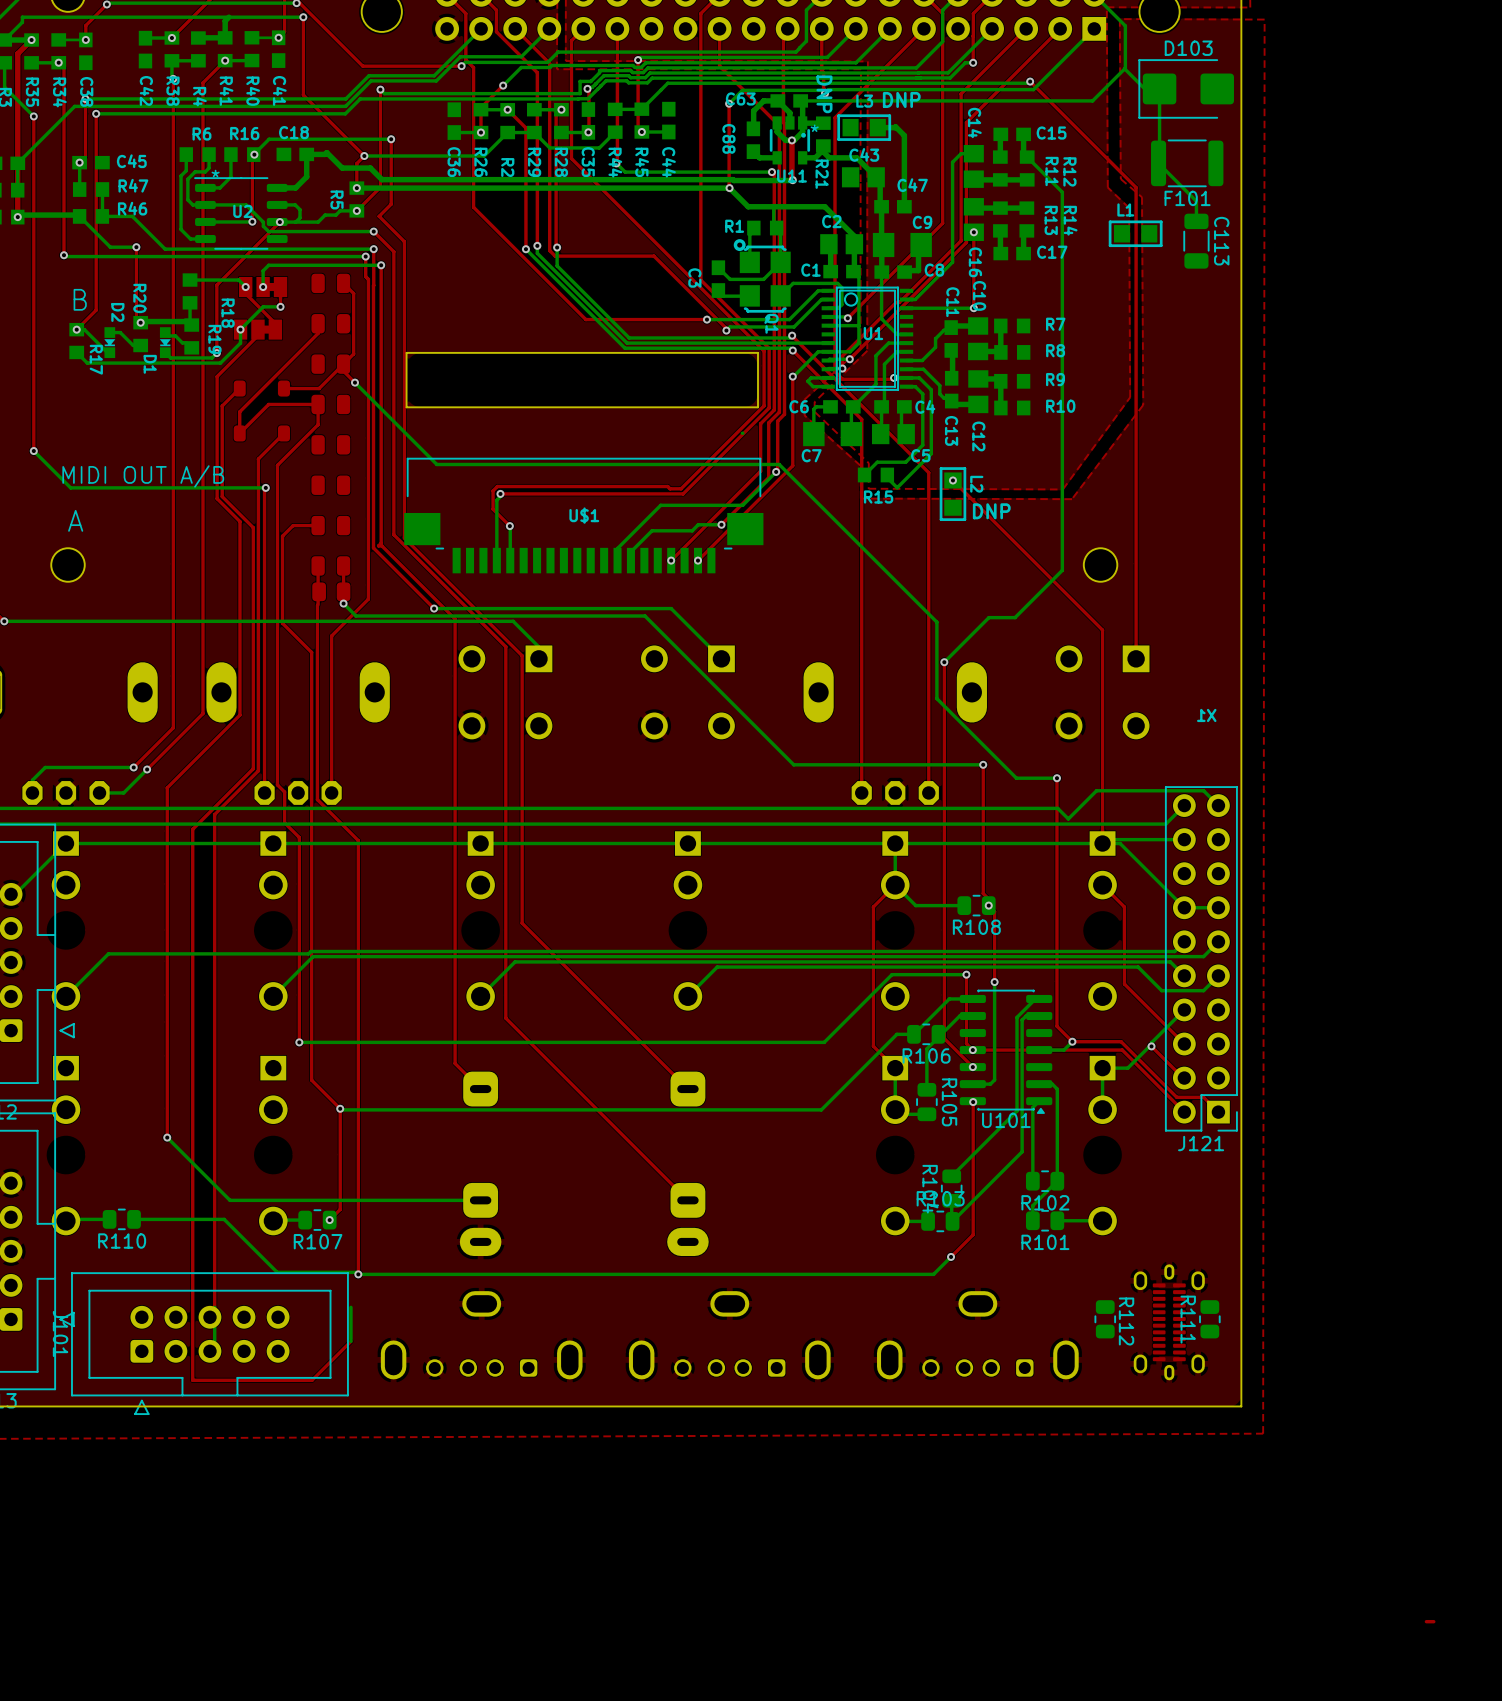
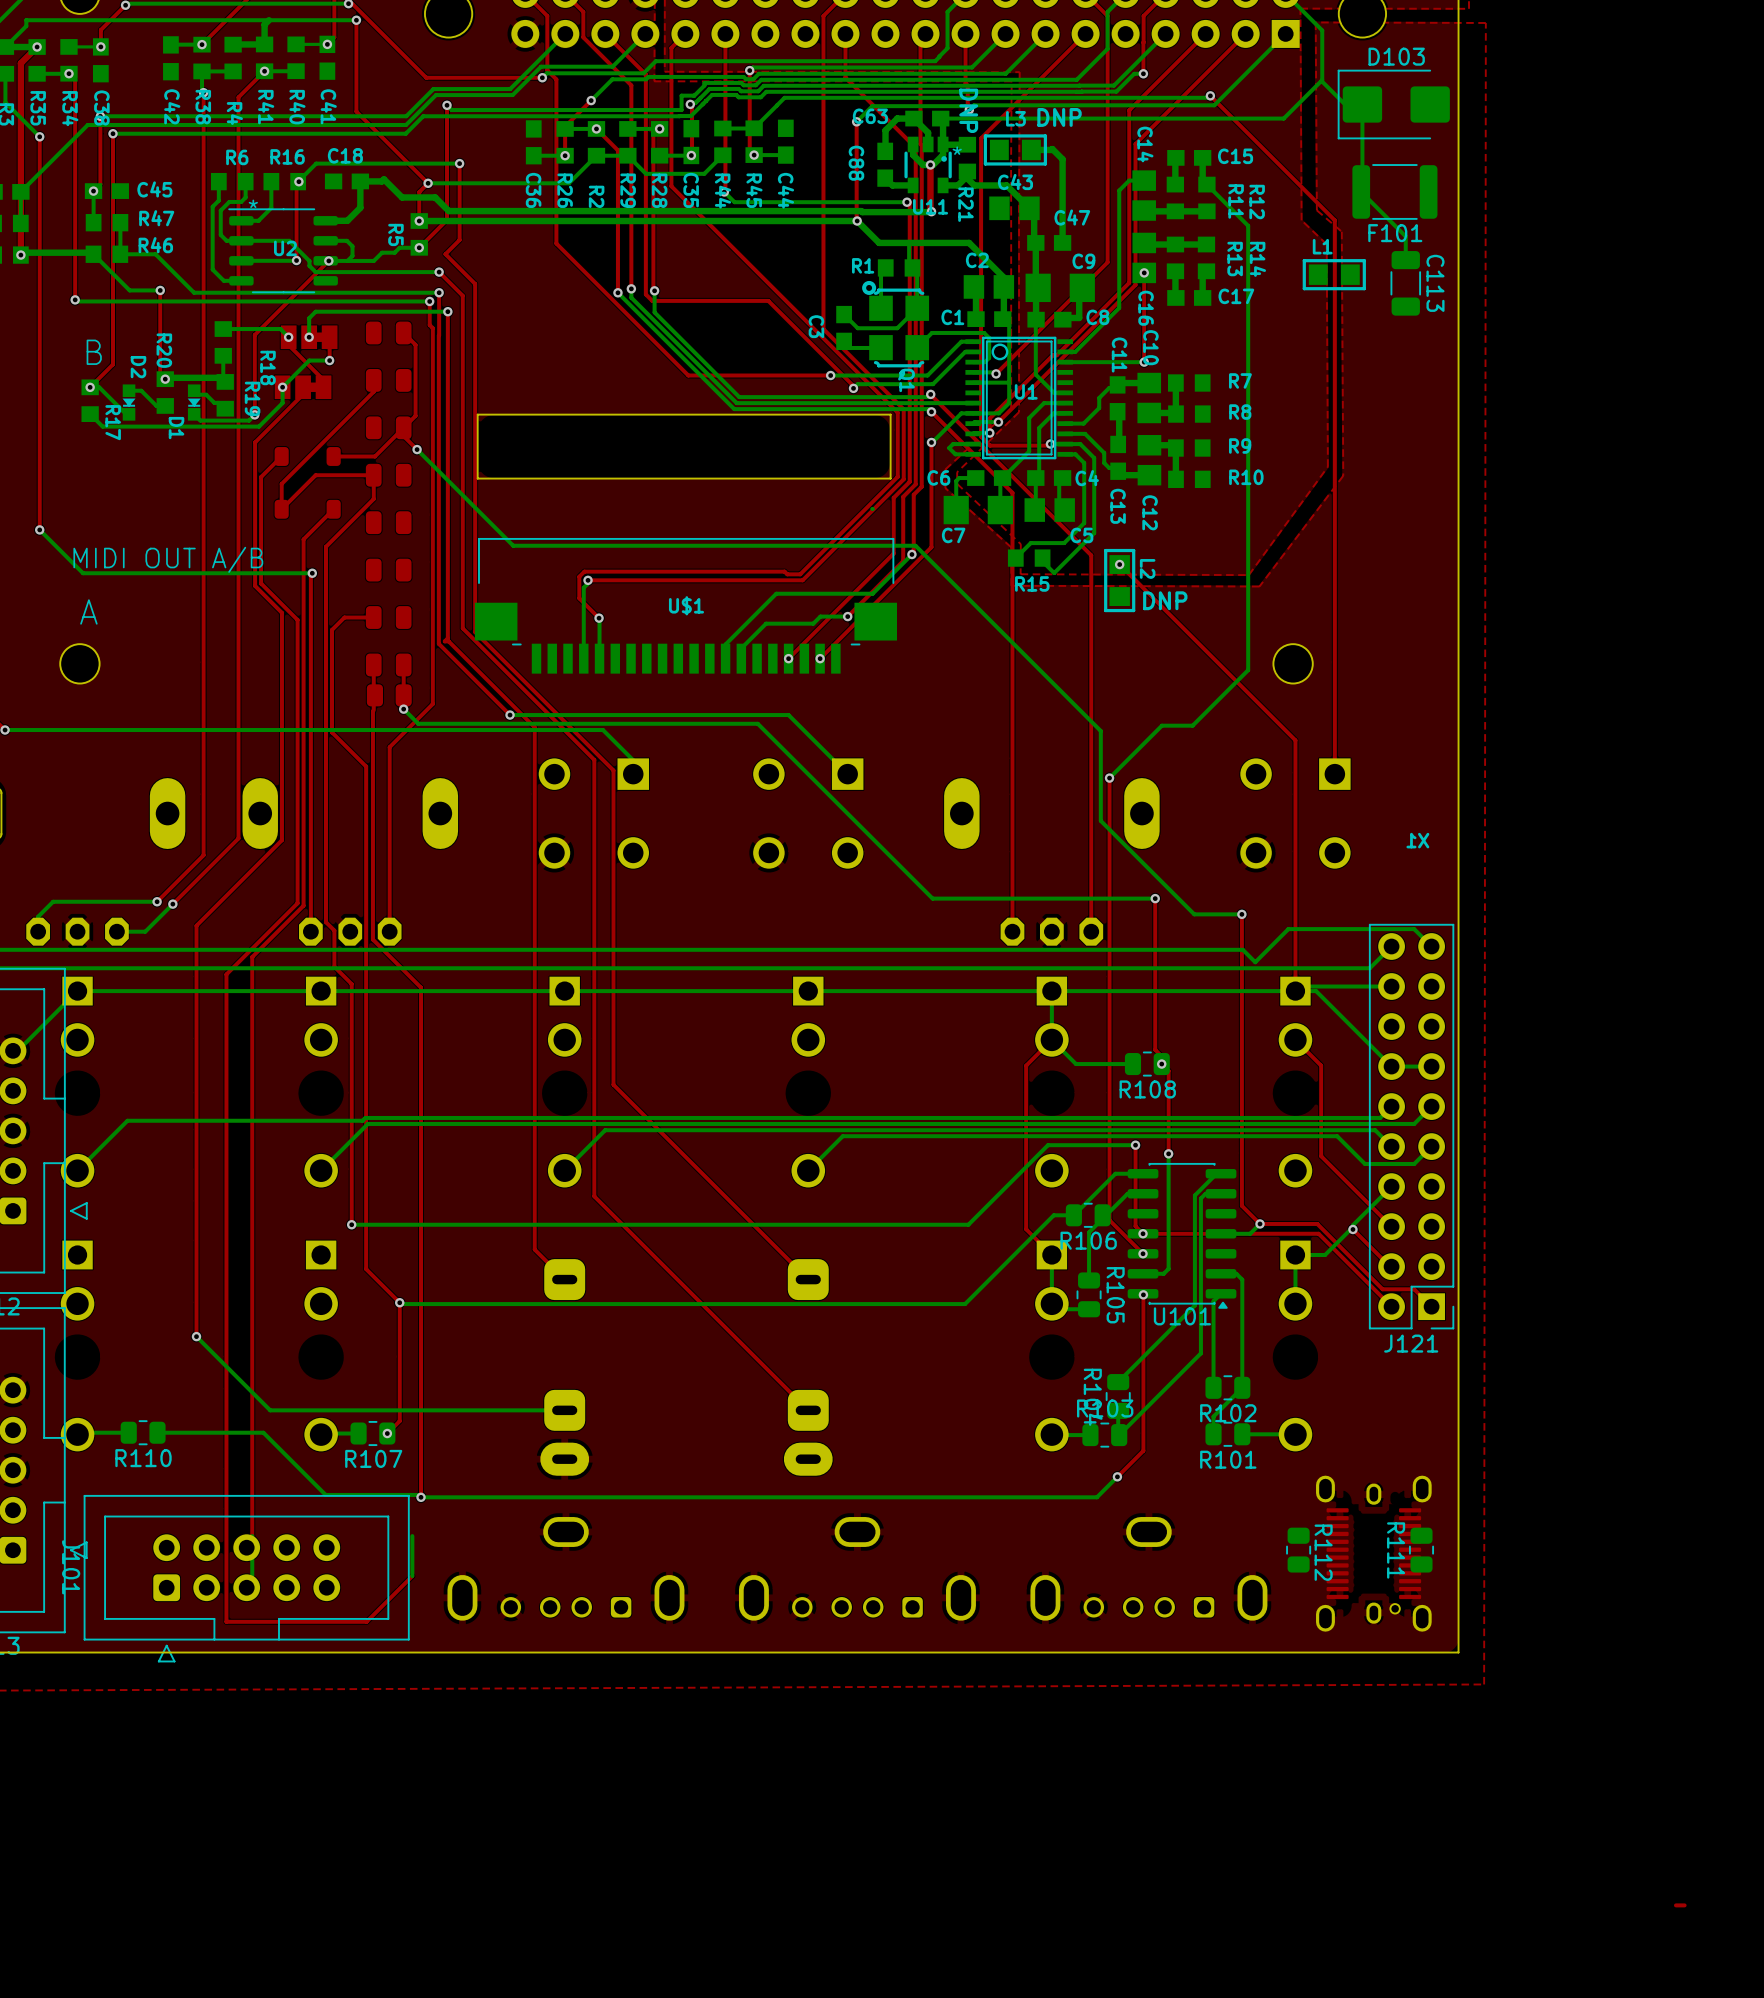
part footprint: [1133, 1264, 1205, 1381] -> [1316, 1475, 1432, 1632]

